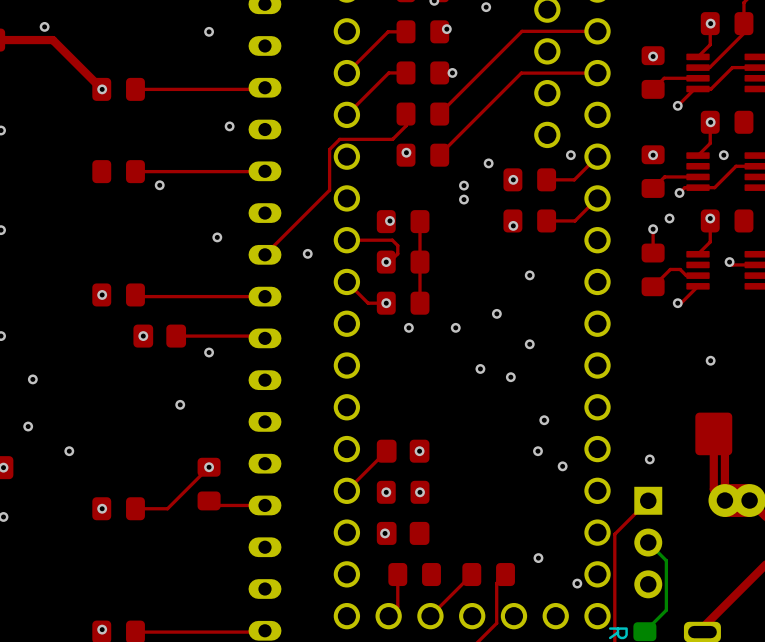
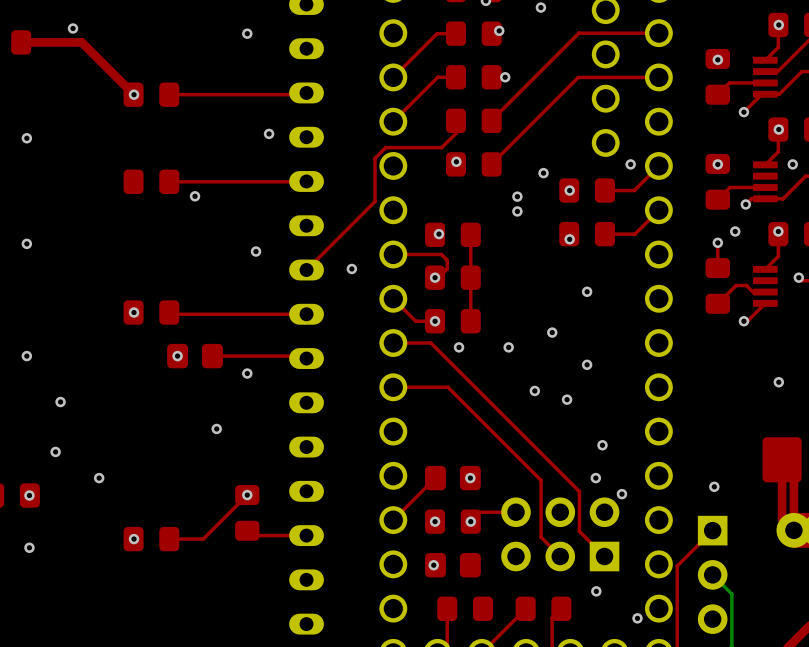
top track: none -> (393, 343) (430, 343) (579, 491) (579, 531) (604, 556)
top track: none -> (393, 387) (448, 387) (541, 480) (541, 537) (560, 556)
top track: none -> (516, 512) (478, 512) (469, 521)
part: none -> (560, 534)

